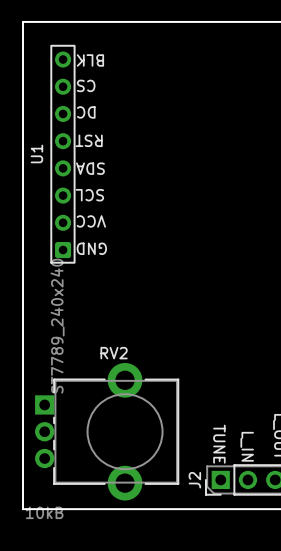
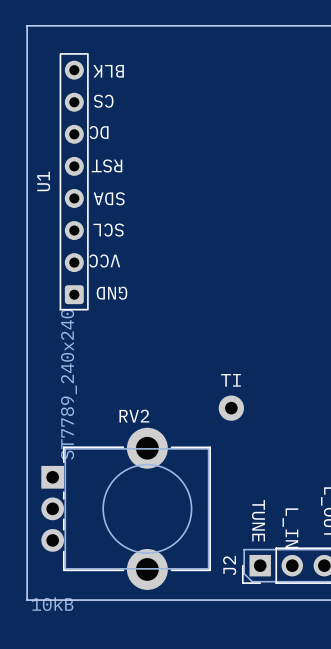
part: none -> TI (231, 408)

